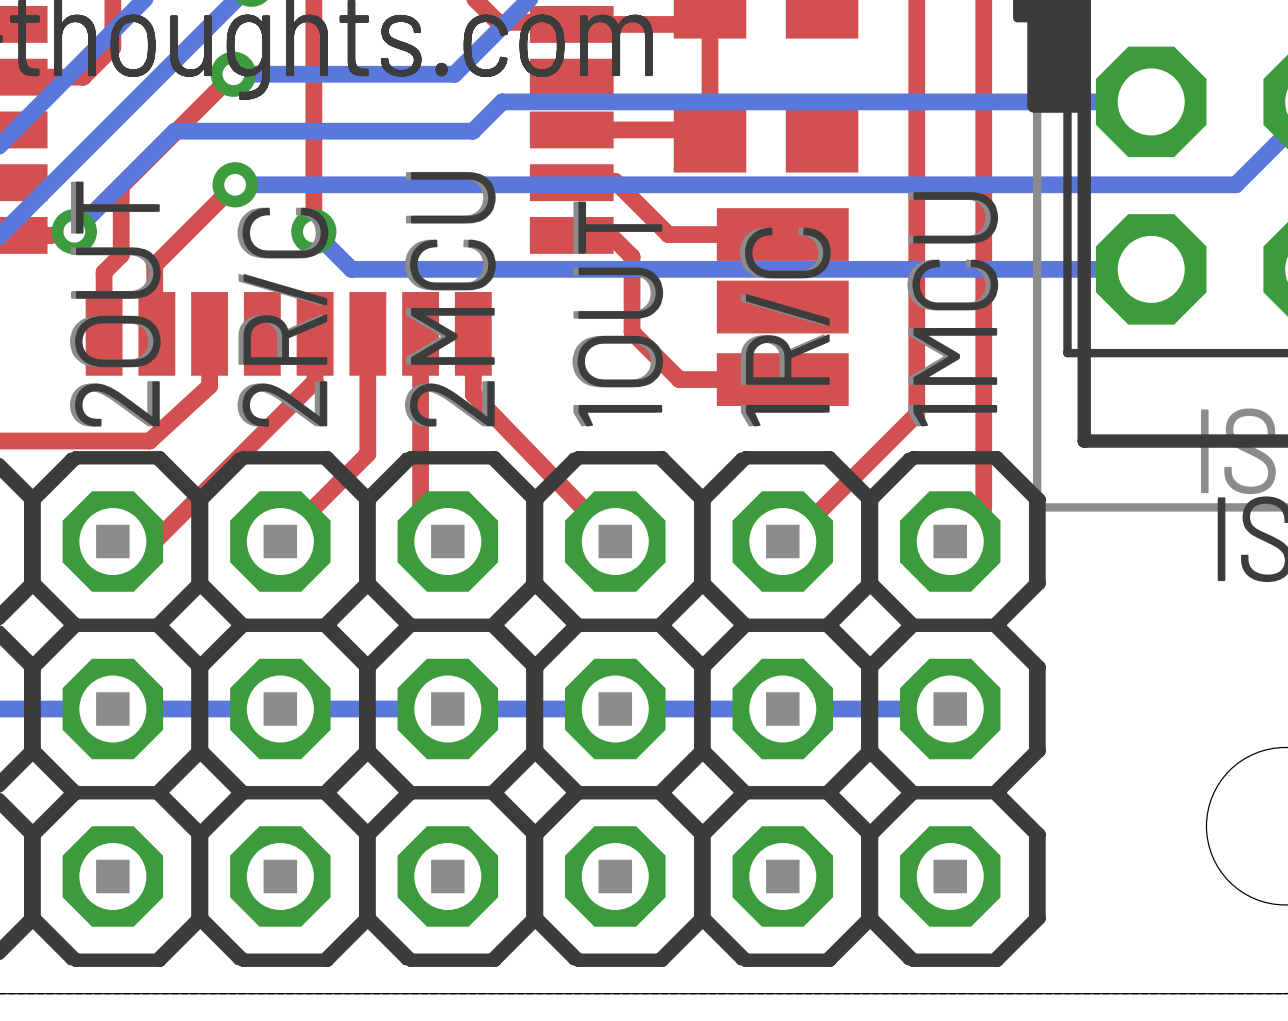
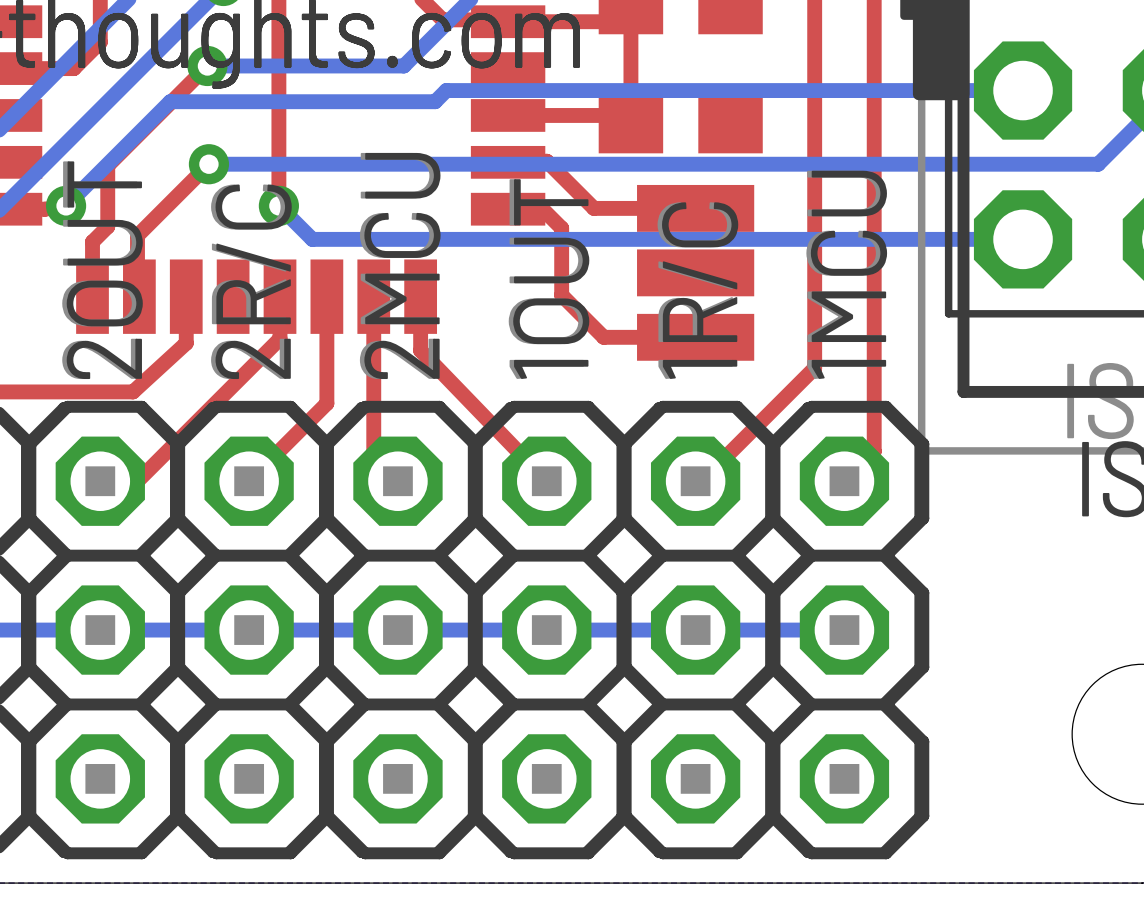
bottom track: (489, 114) (472, 131) (174, 131) -> (435, 101) (170, 101) (155, 116)

